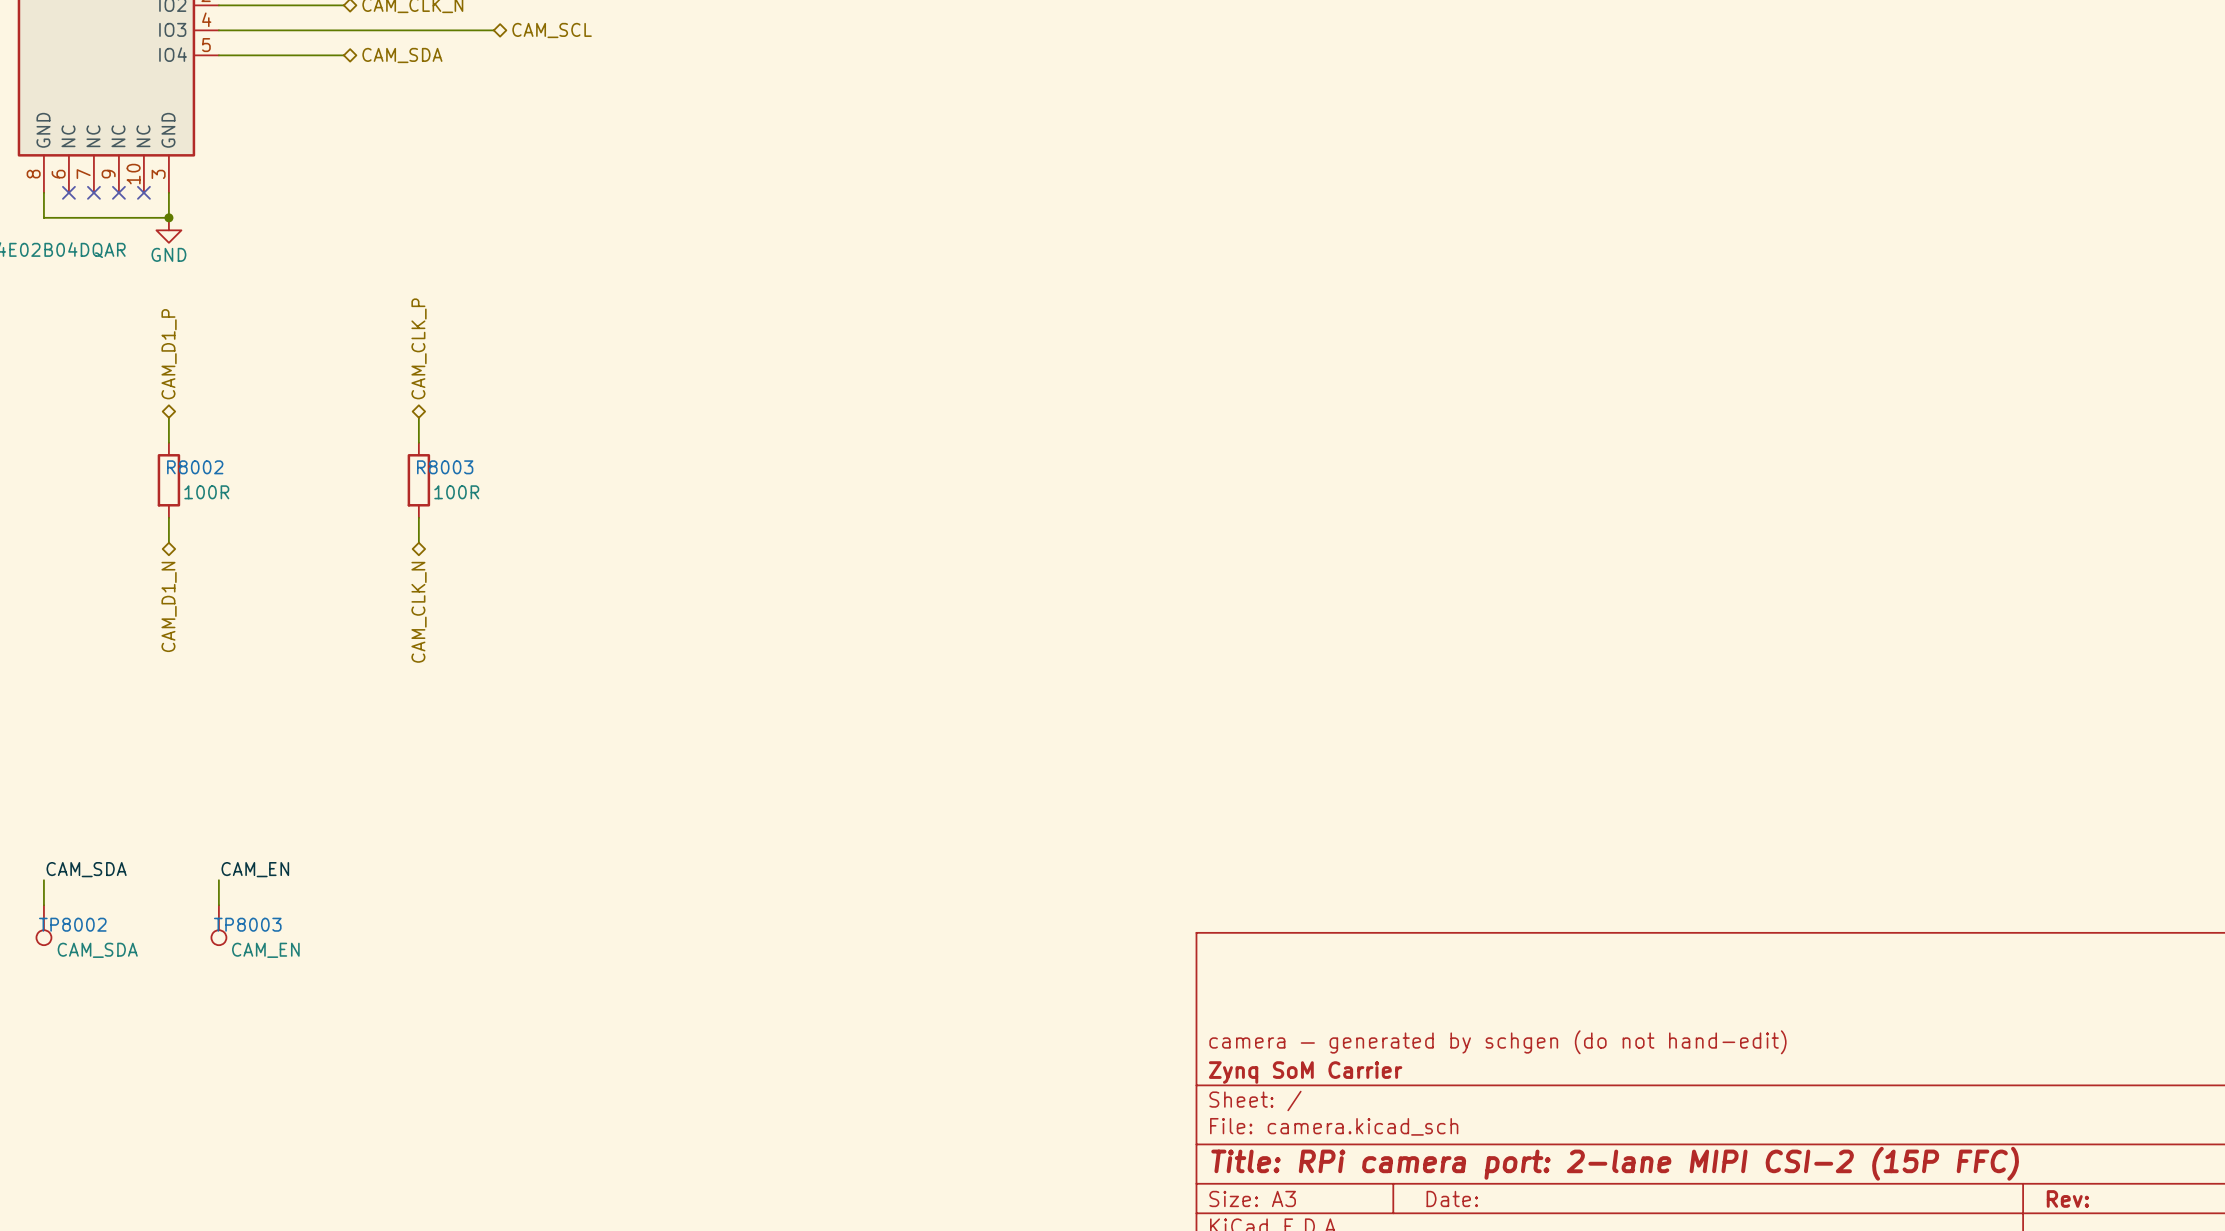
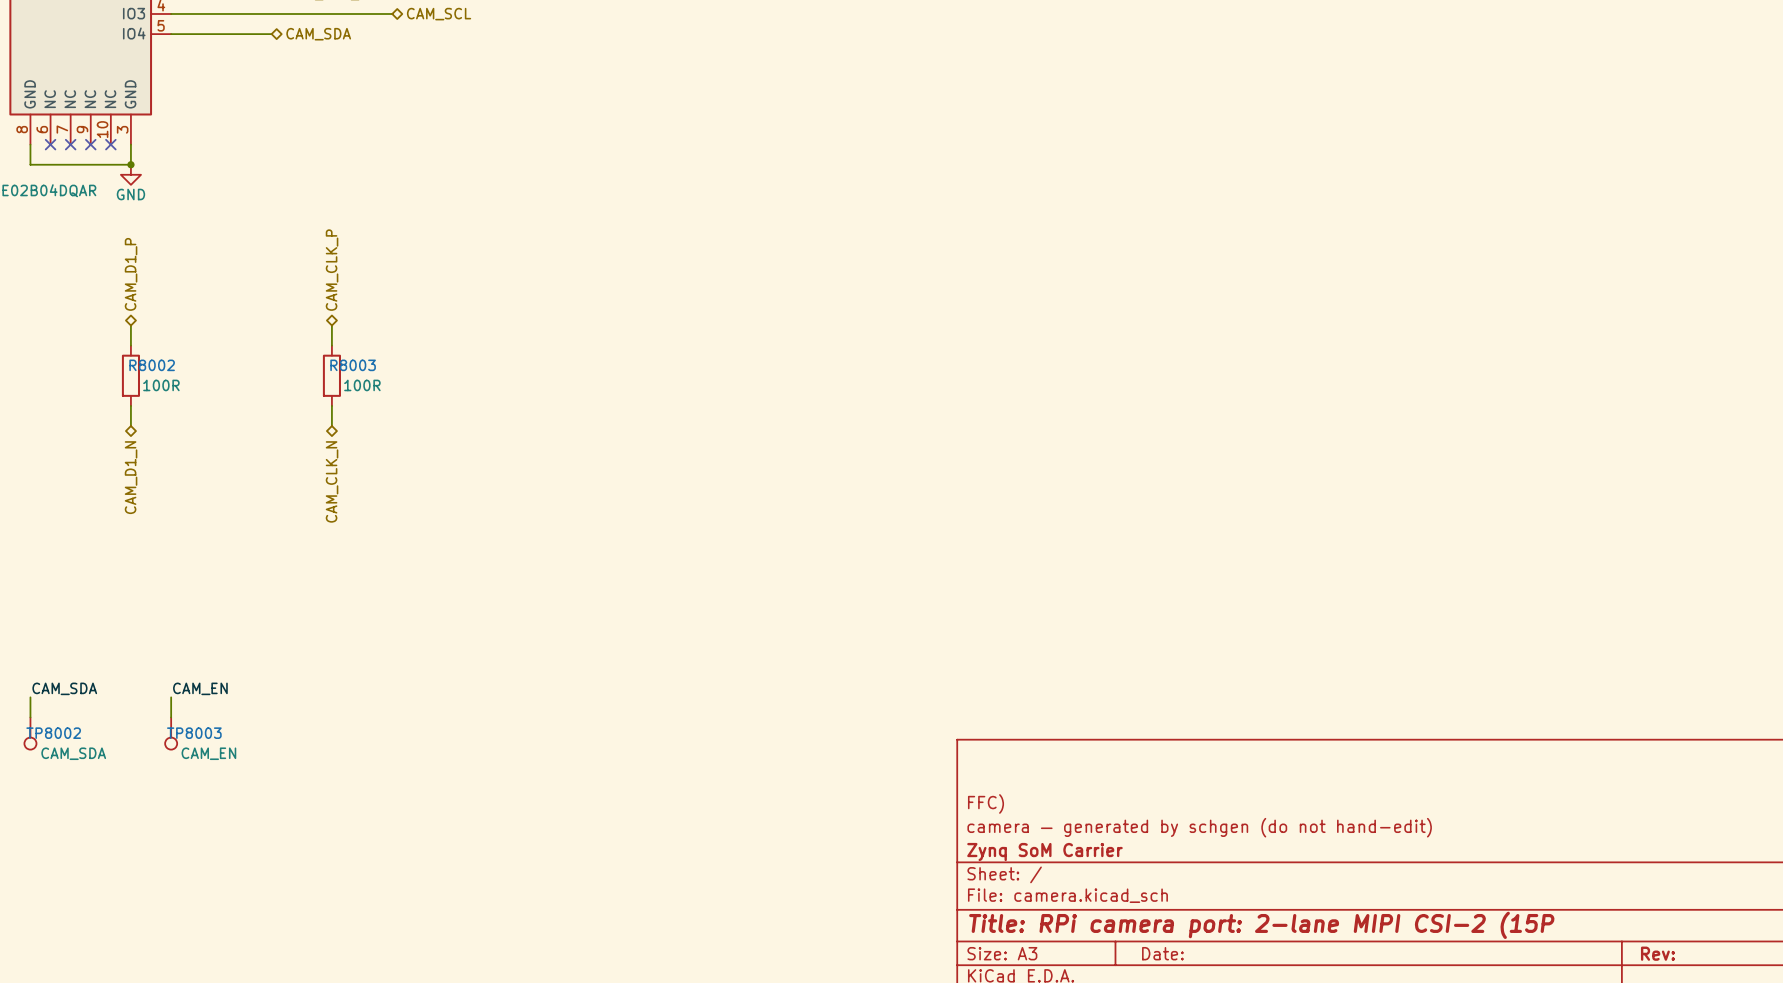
title block: none -> FFC) (985, 803)
title block: Title: RPi camera port: 2-lane MIPI CSI-2 (15P FFC) (1615, 1163) -> Title: RPi camera port: 2-lane MIPI CSI-2 (15P (1261, 925)

